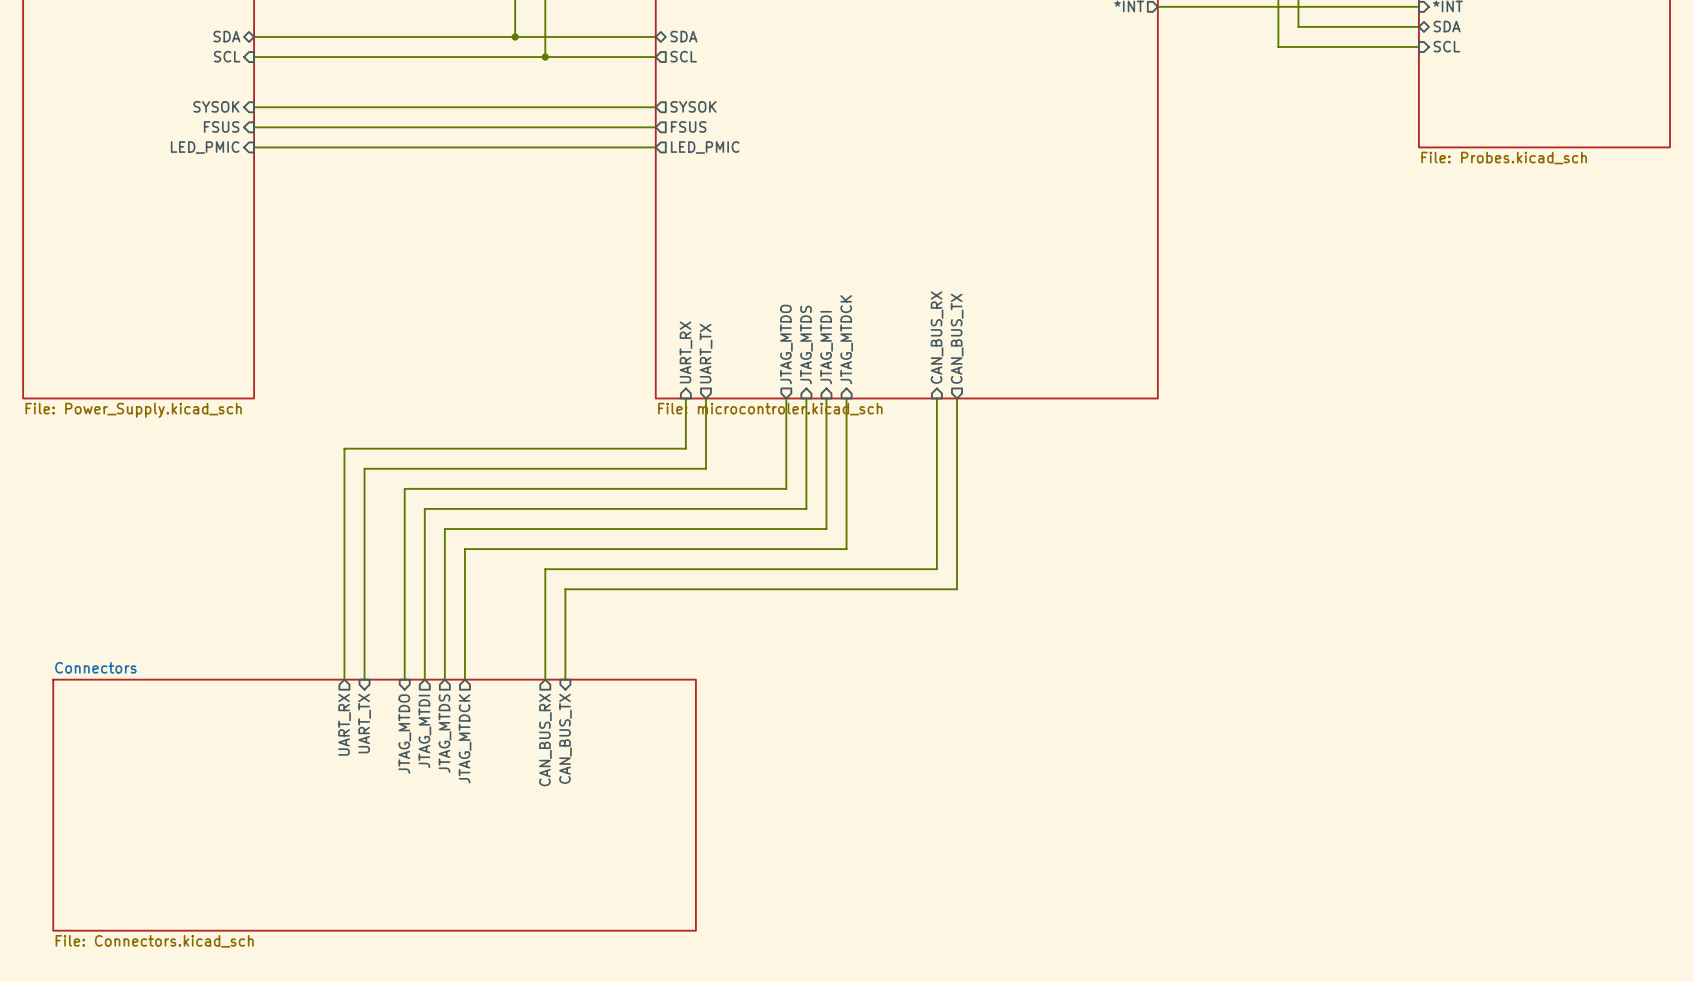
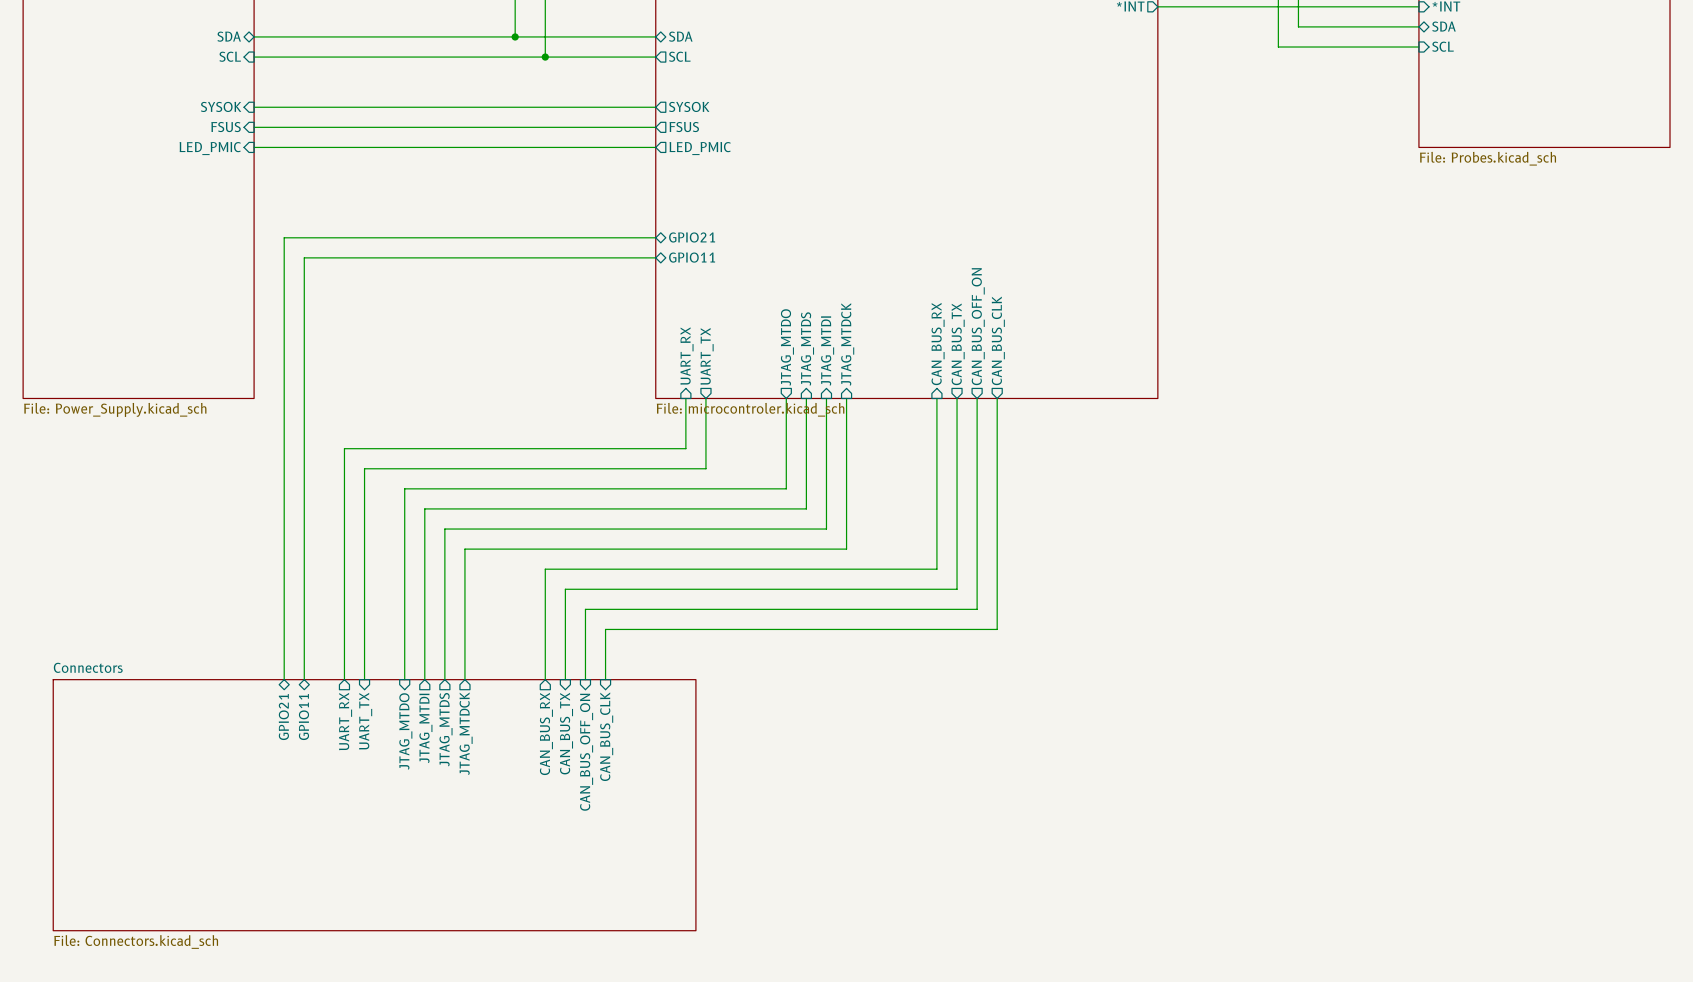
wire: none -> (655, 237) (284, 237) (284, 679)
sheet pin: none -> GPIO21 (692, 237)
wire: none -> (655, 257) (304, 257) (304, 679)
sheet pin: none -> GPIO11 (692, 257)
sheet pin: none -> CAN_BUS_OFF_ON (978, 326)
sheet pin: none -> CAN_BUS_CLK (998, 340)
wire: none -> (977, 398) (977, 609) (585, 609) (585, 679)
wire: none -> (997, 398) (997, 629) (605, 629) (605, 679)
sheet pin: none -> GPIO21 (283, 717)
sheet pin: none -> GPIO11 (303, 717)
sheet pin: none -> CAN_BUS_CLK (606, 736)
sheet pin: none -> CAN_BUS_OFF_ON (586, 752)

